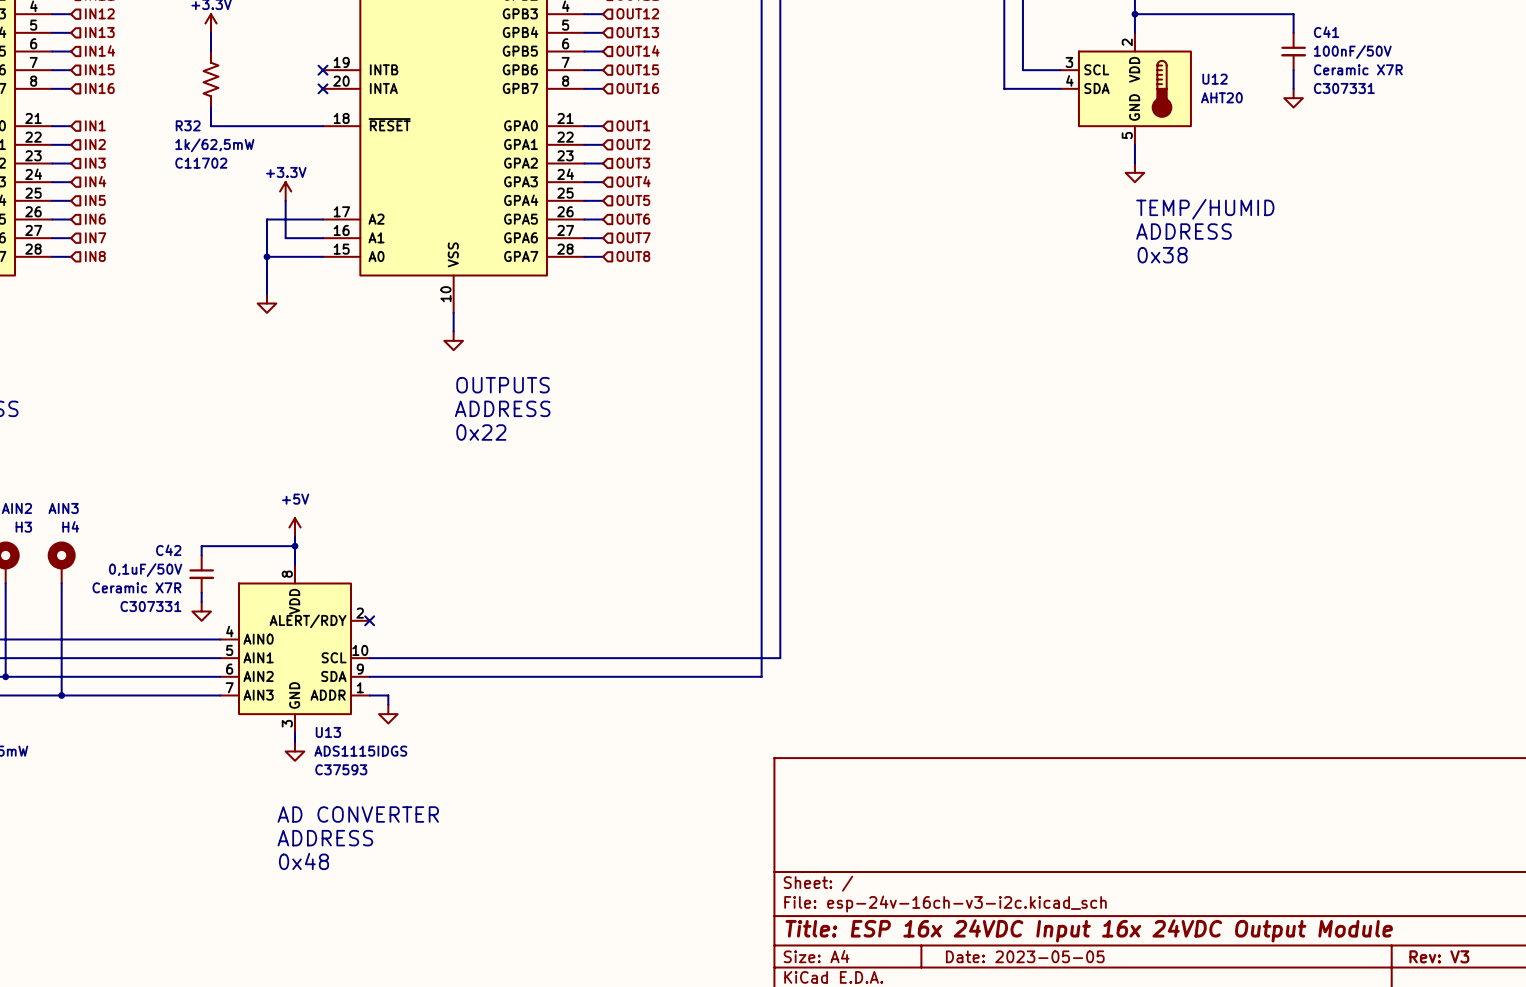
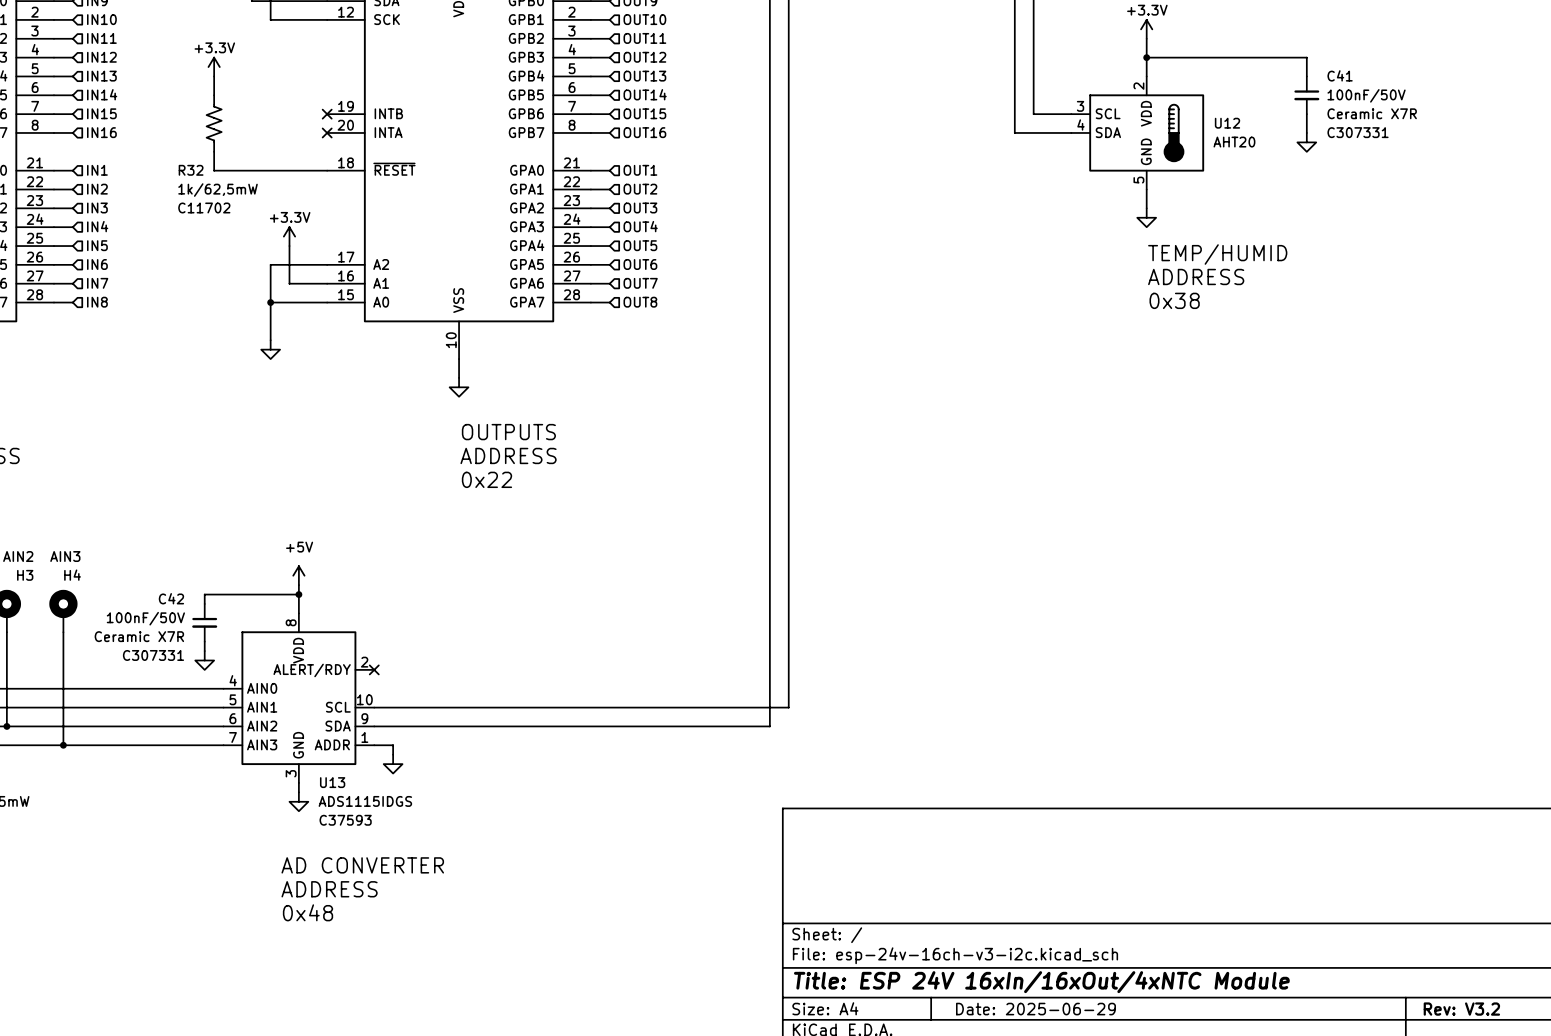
C42 value: 0,1uF/50V (145, 570) -> 100nF/50V (145, 618)
title block: Title: ESP 16x 24VDC Input 16x 24VDC Output Module (1089, 930) -> Title: ESP 24V 16xIn/16xOut/4xNTC Module (1041, 982)
title block: Date: 2023-05-05 (1025, 956) -> Date: 2025-06-29 (1035, 1009)
title block: Rev: V3 (1439, 956) -> Rev: V3.2 (1461, 1009)

